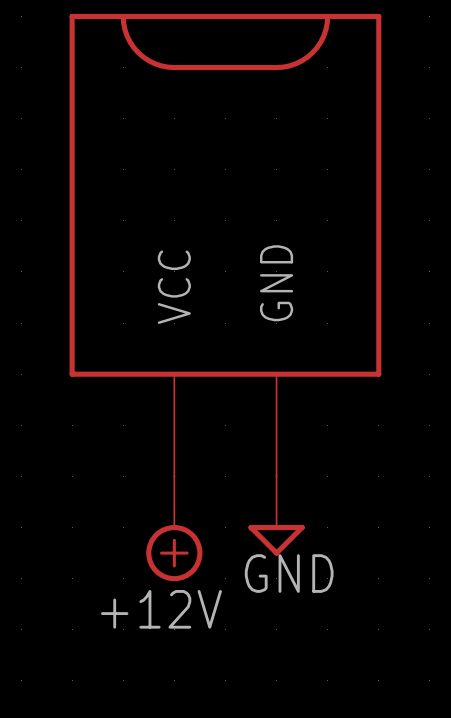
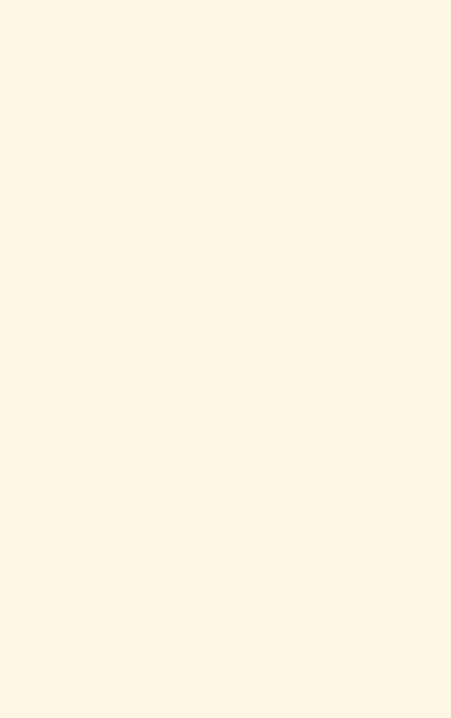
part: (225, 245) -> none
power symbol: GND (276, 516) -> none
power symbol: +12V (174, 528) -> none

